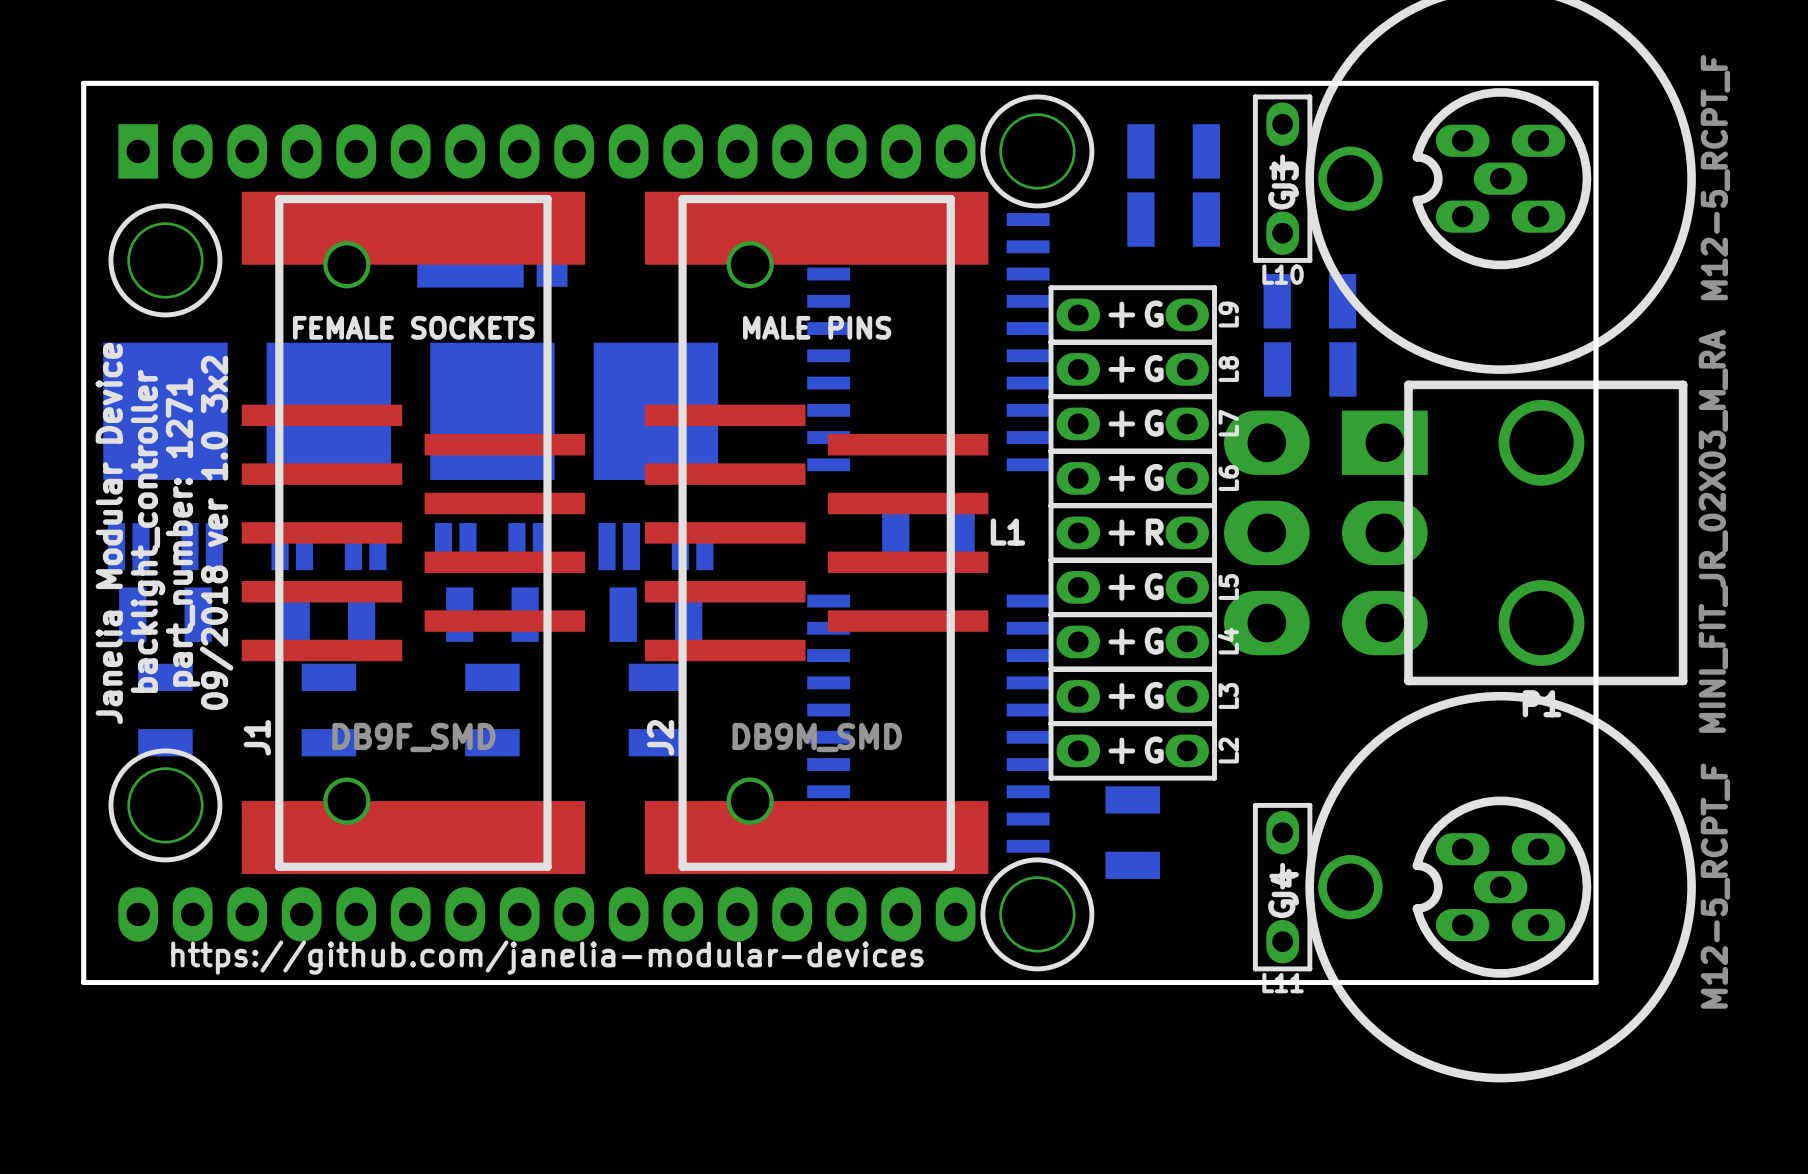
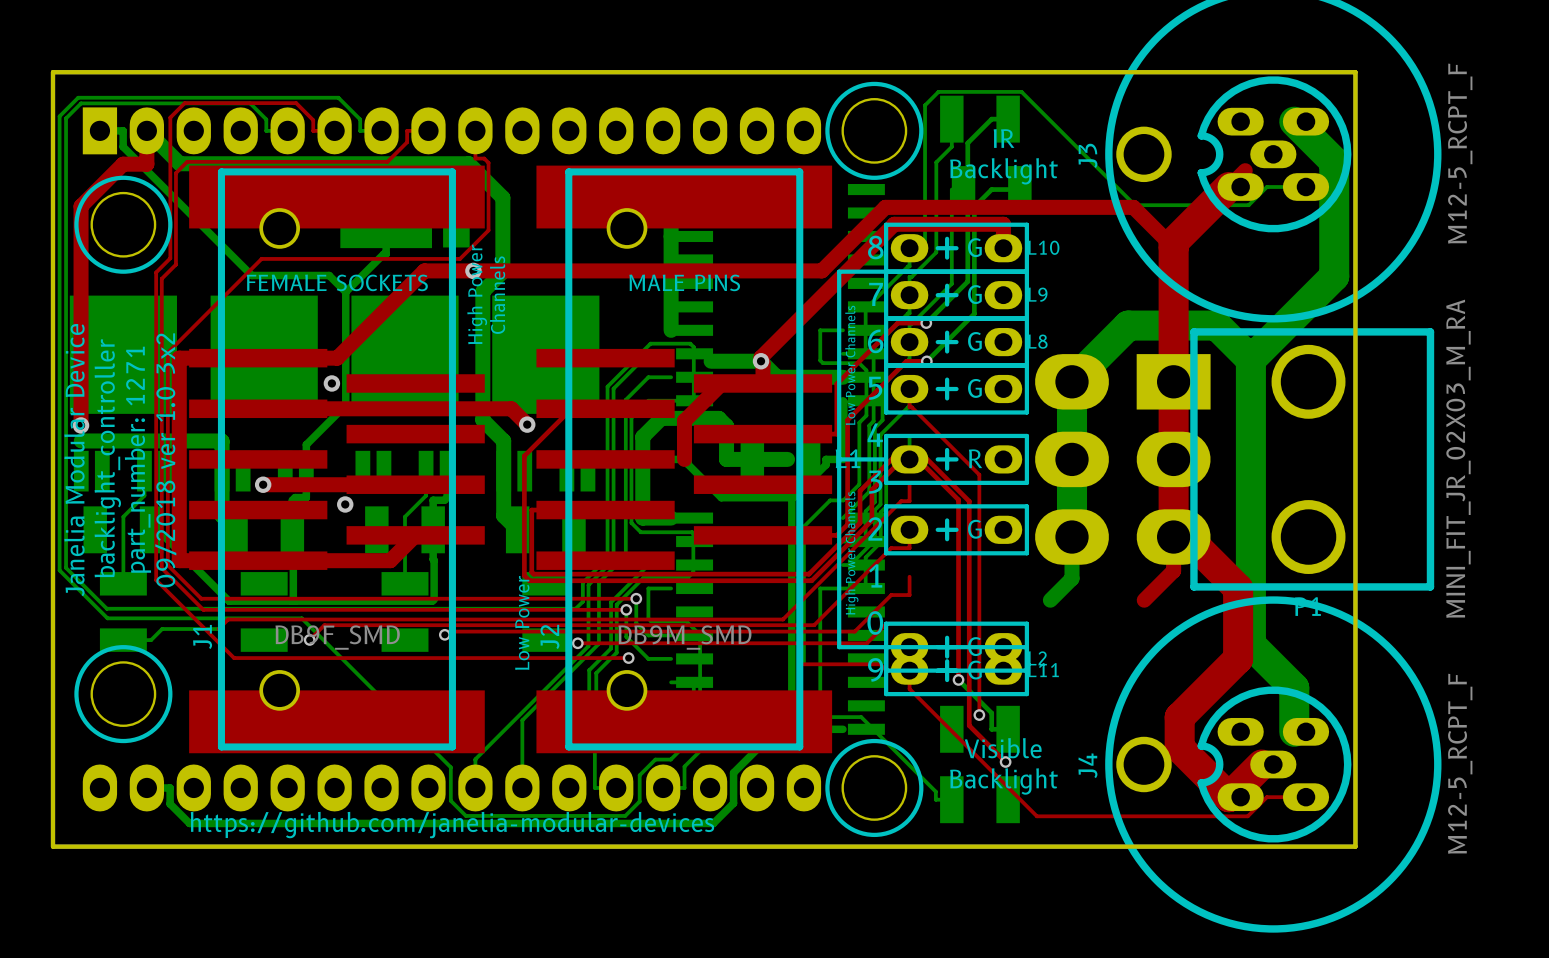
bottom track: none -> (951, 119) (951, 146) (936, 162) (936, 252) (911, 276) (909, 276) (909, 313) (873, 347) (873, 421) (869, 425) (869, 491) (842, 518)
bottom track: none -> (1008, 119) (991, 119) (967, 143) (967, 281) (926, 323)
bottom track: none -> (1294, 121) (1334, 161) (1334, 276) (1250, 359)
bottom track: none -> (99, 130) (123, 130) (123, 146) (251, 275) (329, 275) (345, 292)
bottom track: none -> (146, 130) (179, 163) (468, 163) (502, 197) (502, 271) (482, 291) (482, 420) (503, 440) (503, 515) (517, 529)
top track: none -> (146, 130) (146, 164) (123, 164) (81, 206) (81, 425)
bottom track: none -> (287, 130) (266, 130) (266, 119) (250, 103) (81, 103) (66, 118) (66, 567) (106, 608) (575, 608) (582, 601) (582, 582) (607, 558) (607, 386) (650, 343) (690, 343) (693, 347) (693, 400) (648, 400) (631, 417) (631, 522) (640, 532) (692, 532) (693, 572) (687, 577) (643, 577) (616, 604) (616, 652) (596, 673) (596, 702) (622, 729) (671, 729)
top track: none -> (334, 130) (313, 130) (313, 120) (296, 103) (184, 103) (170, 117) (170, 258) (156, 272) (156, 580) (234, 658) (628, 658)
bottom track: none -> (381, 130) (360, 130) (360, 119) (338, 97) (78, 97) (59, 116) (59, 570) (107, 618) (301, 618) (450, 767) (450, 800) (465, 815) (625, 815) (639, 801) (639, 775) (655, 759) (670, 759) (693, 736) (693, 682) (671, 682)
top track: none -> (428, 130) (407, 130) (407, 142) (387, 161) (187, 161) (175, 173) (175, 264) (161, 278) (161, 568) (203, 609) (626, 609)
top track: none -> (475, 130) (475, 158) (484, 158) (488, 162) (488, 230) (460, 258) (261, 258) (167, 352) (167, 565) (201, 598) (636, 598)
part position: (1173, 151) -> (979, 119)
text: none -> IR (1004, 138)
L10 rotation: 0° (1282, 178) -> 90° counterclockwise (956, 248)
L10 position: (1282, 178) -> (956, 248)
top track: none -> (1245, 170) (1173, 242) (1173, 537)
text: none -> Backlight (1003, 171)
bottom track: none -> (1294, 187) (1266, 187) (1248, 205) (1134, 205) (1021, 91) (938, 91) (925, 105) (925, 241) (909, 257)
bottom track: none -> (671, 189) (671, 330)
bottom track: none -> (951, 189) (951, 283) (911, 323) (909, 323) (909, 360) (882, 385) (882, 420) (874, 427) (874, 502) (865, 511) (865, 541) (842, 541)
bottom track: none -> (1008, 189) (991, 189) (974, 206) (974, 313) (926, 361)
bottom track: none -> (386, 213) (386, 254) (383, 254) (345, 292)
text: none -> 8 (875, 247)
top track: none -> (1173, 247) (1133, 207) (885, 207) (821, 270) (424, 270) (337, 358) (179, 358) (179, 560) (390, 560) (415, 535)
bottom track: none -> (909, 248) (909, 266) (865, 308) (865, 353) (842, 353)
top track: none -> (1003, 248) (1003, 224) (894, 224) (761, 357) (763, 363) (763, 383) (722, 383) (684, 420) (684, 459)
part: (1309, 301) -> none
via: none -> (473, 270)
line: none -> (886, 271) (839, 271) (839, 647) (886, 647)
L9 position: (1132, 314) -> (956, 295)
L9 name rotation: 0° (1228, 314) -> 90° clockwise (1037, 294)
bottom track: none -> (345, 292) (345, 405) (306, 444) (306, 497) (295, 497) (292, 500) (293, 599)
text: none -> High Power (477, 294)
text: none -> 7 (876, 294)
text: none -> Channels (497, 295)
L8 position: (1132, 369) -> (956, 342)
L8 name rotation: 0° (1228, 369) -> 90° clockwise (1037, 341)
part: (1310, 369) -> none
top track: none -> (926, 323) (897, 323) (836, 383) (836, 434) (763, 434)
via: none -> (926, 323)
bottom track: none -> (842, 330) (820, 330) (820, 360) (822, 363) (859, 363) (866, 370) (866, 415) (859, 422) (859, 484) (843, 500) (830, 500) (803, 526) (803, 664)
text: none -> 6 (875, 341)
bottom track: none -> (671, 353) (648, 353) (613, 388) (613, 560) (588, 585) (588, 646) (475, 759) (475, 787)
bottom track: none -> (1250, 359) (1216, 325) (1128, 325) (1072, 381) (1072, 578) (1050, 600)
bottom track: none -> (1250, 359) (1250, 644) (1294, 687) (1294, 731)
bottom track: none -> (711, 361) (761, 361) (777, 377) (842, 377)
via: none -> (761, 361)
top track: none -> (926, 361) (906, 361) (847, 420) (847, 524) (836, 535) (763, 535)
via: none -> (926, 361)
text: none -> Low Power Channels (850, 365)
L7: (1132, 423) -> none
bottom track: none -> (671, 377) (648, 377) (625, 399) (625, 555) (598, 582) (598, 643) (522, 720) (522, 787)
via: none -> (331, 383)
text: none -> 5 (875, 388)
bottom track: none -> (909, 389) (909, 407) (880, 434) (880, 504) (874, 510) (874, 540) (850, 565) (842, 565)
top track: none -> (909, 389) (909, 407) (911, 407) (979, 474) (979, 715)
part: none -> (956, 389)
bottom track: none -> (842, 400) (843, 459) (826, 459) (826, 464) (793, 497) (721, 497) (688, 464) (688, 459) (670, 459)
top track: none -> (258, 408) (511, 408) (527, 424)
top track: none -> (605, 408) (571, 408) (524, 456) (524, 575) (529, 580) (811, 580) (871, 520) (871, 489) (897, 464) (923, 464) (958, 499) (958, 679)
L6: (1132, 478) -> none
via: none -> (527, 424)
via: none -> (81, 425)
text: none -> 4 (875, 435)
bottom track: none -> (909, 435) (909, 454) (886, 475) (886, 506) (880, 512) (880, 542) (865, 557) (865, 588) (820, 588) (820, 713) (823, 717) (861, 717) (935, 791) (935, 799) (951, 799)
bottom track: none -> (81, 440) (221, 440) (222, 515) (236, 529)
bottom track: none -> (787, 459) (726, 459) (726, 426) (718, 418) (661, 418) (642, 436) (642, 518) (671, 518)
line: none -> (839, 459) (886, 459)
bottom track: none -> (144, 471) (144, 495) (123, 516) (123, 583)
bottom track: none -> (426, 471) (426, 495) (405, 516) (405, 583)
bottom track: none -> (447, 471) (447, 497) (444, 500) (433, 500) (434, 599) (432, 601) (295, 601) (293, 599)
text: none -> 3 (875, 482)
top track: none -> (909, 482) (909, 501) (901, 501) (782, 619) (228, 619) (218, 629)
top track: none -> (263, 484) (415, 484)
via: none -> (263, 484)
bottom track: none -> (791, 497) (791, 702) (818, 729) (842, 729)
via: none -> (345, 504)
L5: (1132, 587) -> none
top track: none -> (605, 510) (531, 510) (531, 572) (533, 574) (809, 574) (860, 523) (860, 490) (893, 457) (925, 457) (969, 501) (969, 725) (1005, 762)
bottom track: none -> (151, 523) (229, 601) (291, 601) (293, 599)
text: none -> 2 (875, 528)
top track: none -> (909, 529) (909, 548) (891, 548) (814, 625) (324, 625) (309, 639)
part: none -> (956, 529)
top track: none -> (1173, 537) (1173, 570) (1144, 600)
top track: none -> (1173, 537) (1186, 537) (1238, 588) (1238, 658) (1179, 717) (1179, 747) (1228, 797) (1261, 764)
text: none -> High Power Channels (851, 553)
L4: (1132, 641) -> none
bottom track: none -> (671, 565) (648, 565) (611, 602) (611, 648) (589, 670) (589, 708) (594, 713) (594, 787) (616, 787)
text: none -> 1 (875, 575)
top track: none -> (909, 576) (909, 595) (891, 595) (854, 631) (448, 631) (444, 634)
bottom track: none -> (671, 588) (648, 588) (648, 618) (650, 621) (686, 621) (700, 634) (700, 751) (684, 766) (684, 787) (663, 787)
bottom track: none -> (636, 598) (636, 623) (648, 635) (671, 635)
via: none -> (636, 598)
L3: (1132, 696) -> none
bottom track: none -> (626, 609) (626, 636) (648, 658) (671, 658)
via: none -> (626, 609)
text: none -> Low Power (522, 622)
text: none -> 0 (875, 622)
top track: none -> (909, 623) (886, 623) (867, 643) (577, 643)
bottom track: none -> (218, 629) (162, 629) (151, 640) (123, 640)
via: none -> (444, 634)
via: none -> (309, 639)
via: none -> (577, 643)
L2 name rotation: 0° (1228, 750) -> 90° clockwise (1037, 658)
via: none -> (628, 658)
top track: none -> (803, 664) (880, 664) (886, 670) (909, 670) (909, 688) (1036, 816) (1247, 816) (1266, 797) (1294, 797)
text: none -> 9 (875, 669)
bottom track: none -> (958, 679) (991, 713) (991, 729) (1008, 729)
via: none -> (958, 679)
bottom track: none -> (797, 708) (733, 772) (733, 803) (713, 823) (189, 823) (170, 803) (170, 787) (146, 787)
via: none -> (979, 715)
part rotation: 0° (1132, 832) -> 90° clockwise (979, 729)
text: none -> Visible (1003, 748)
via: none -> (1005, 762)
L11 rotation: 0° (1282, 887) -> 90° counterclockwise (956, 670)
L11 position: (1282, 887) -> (956, 670)
text: none -> Backlight (1003, 781)
part: none -> (979, 799)

